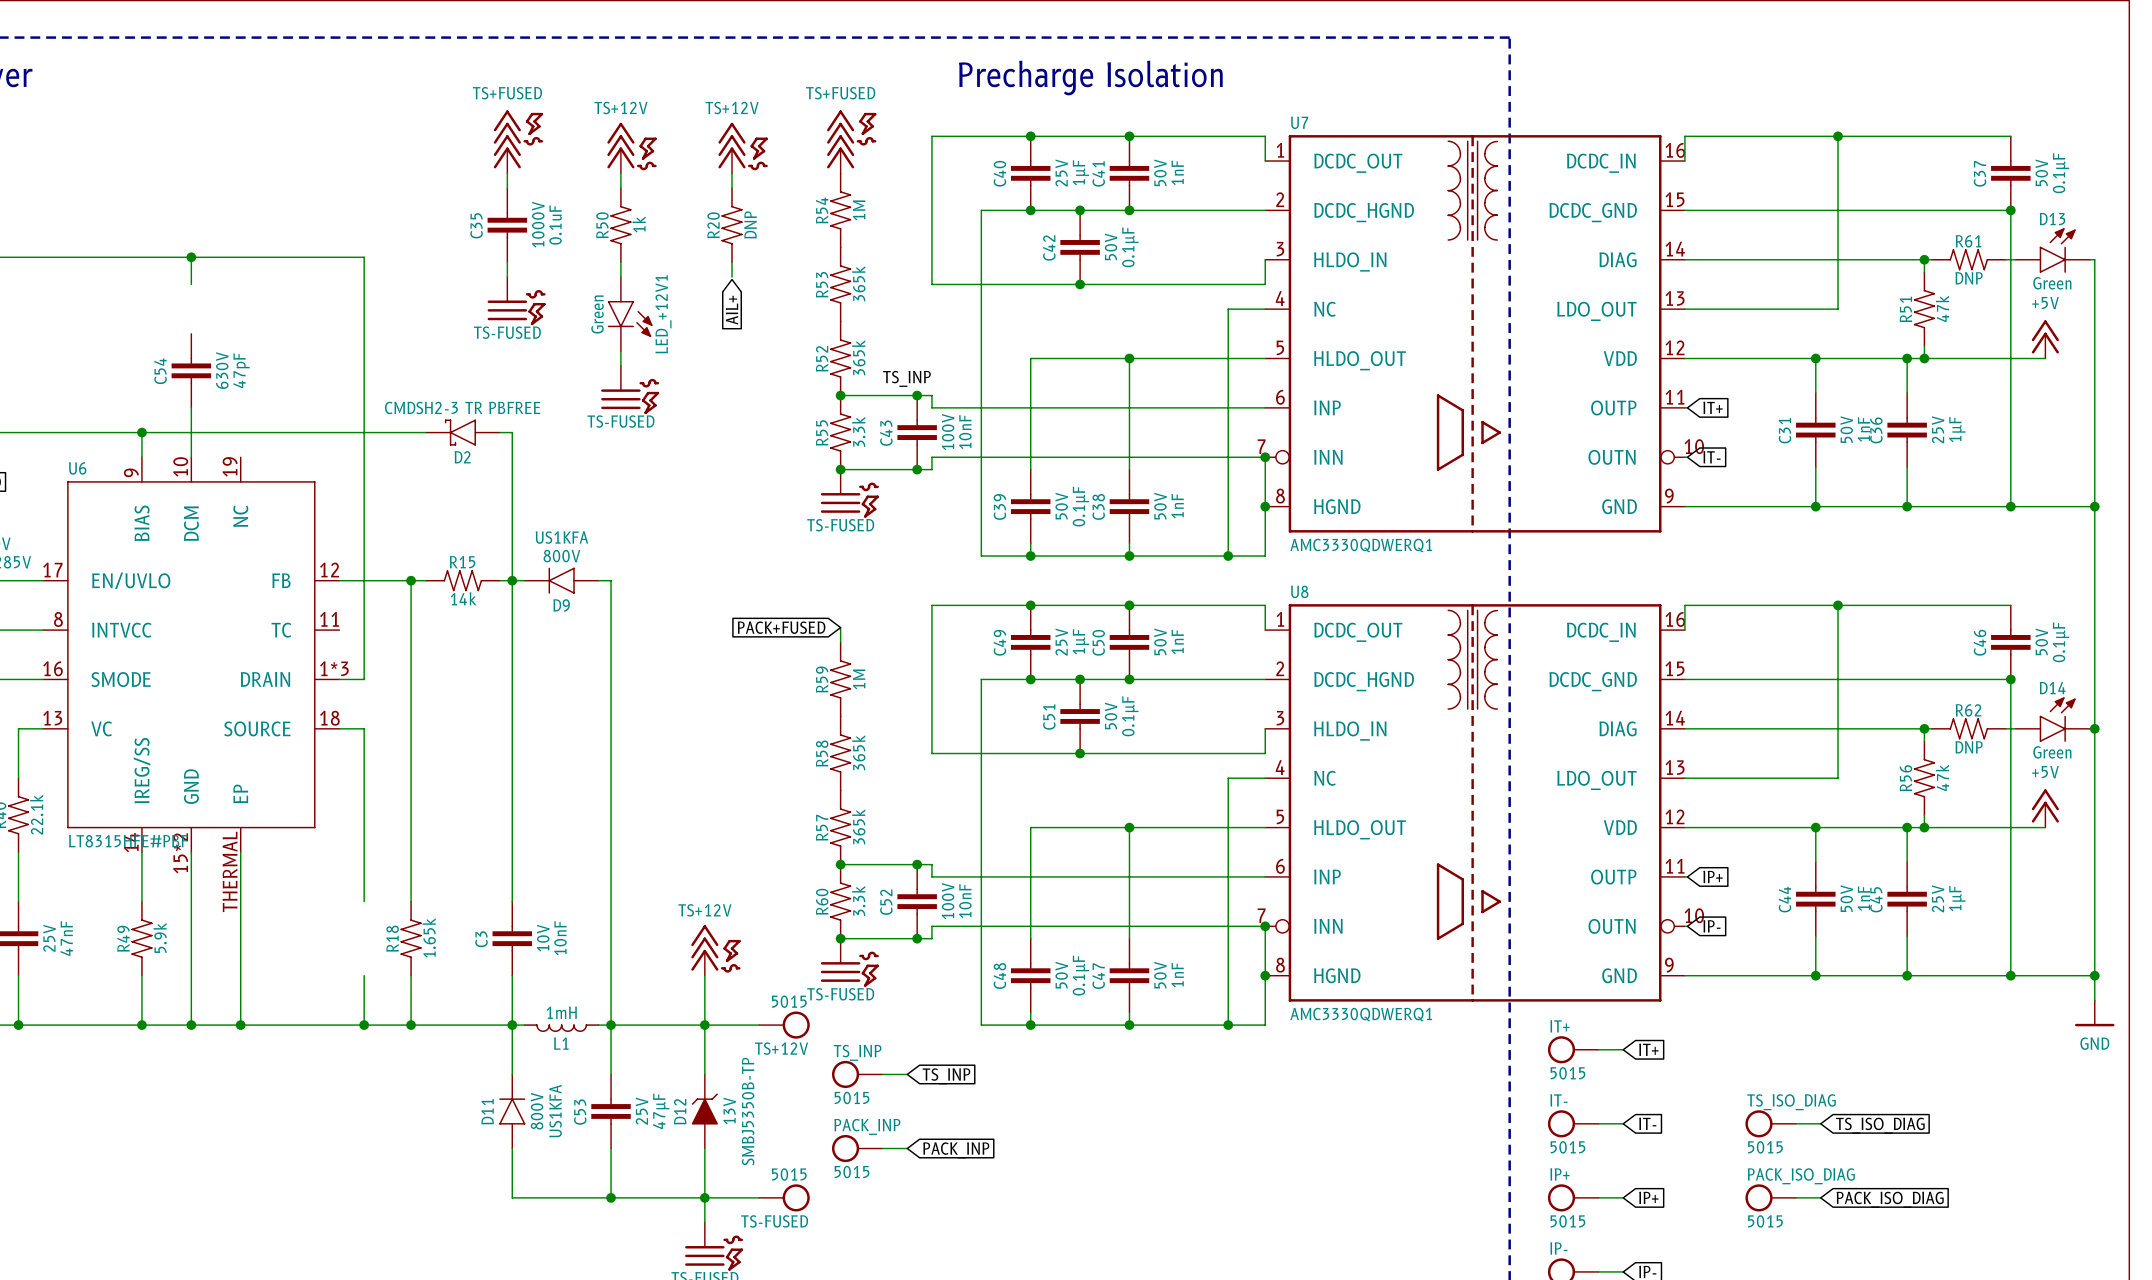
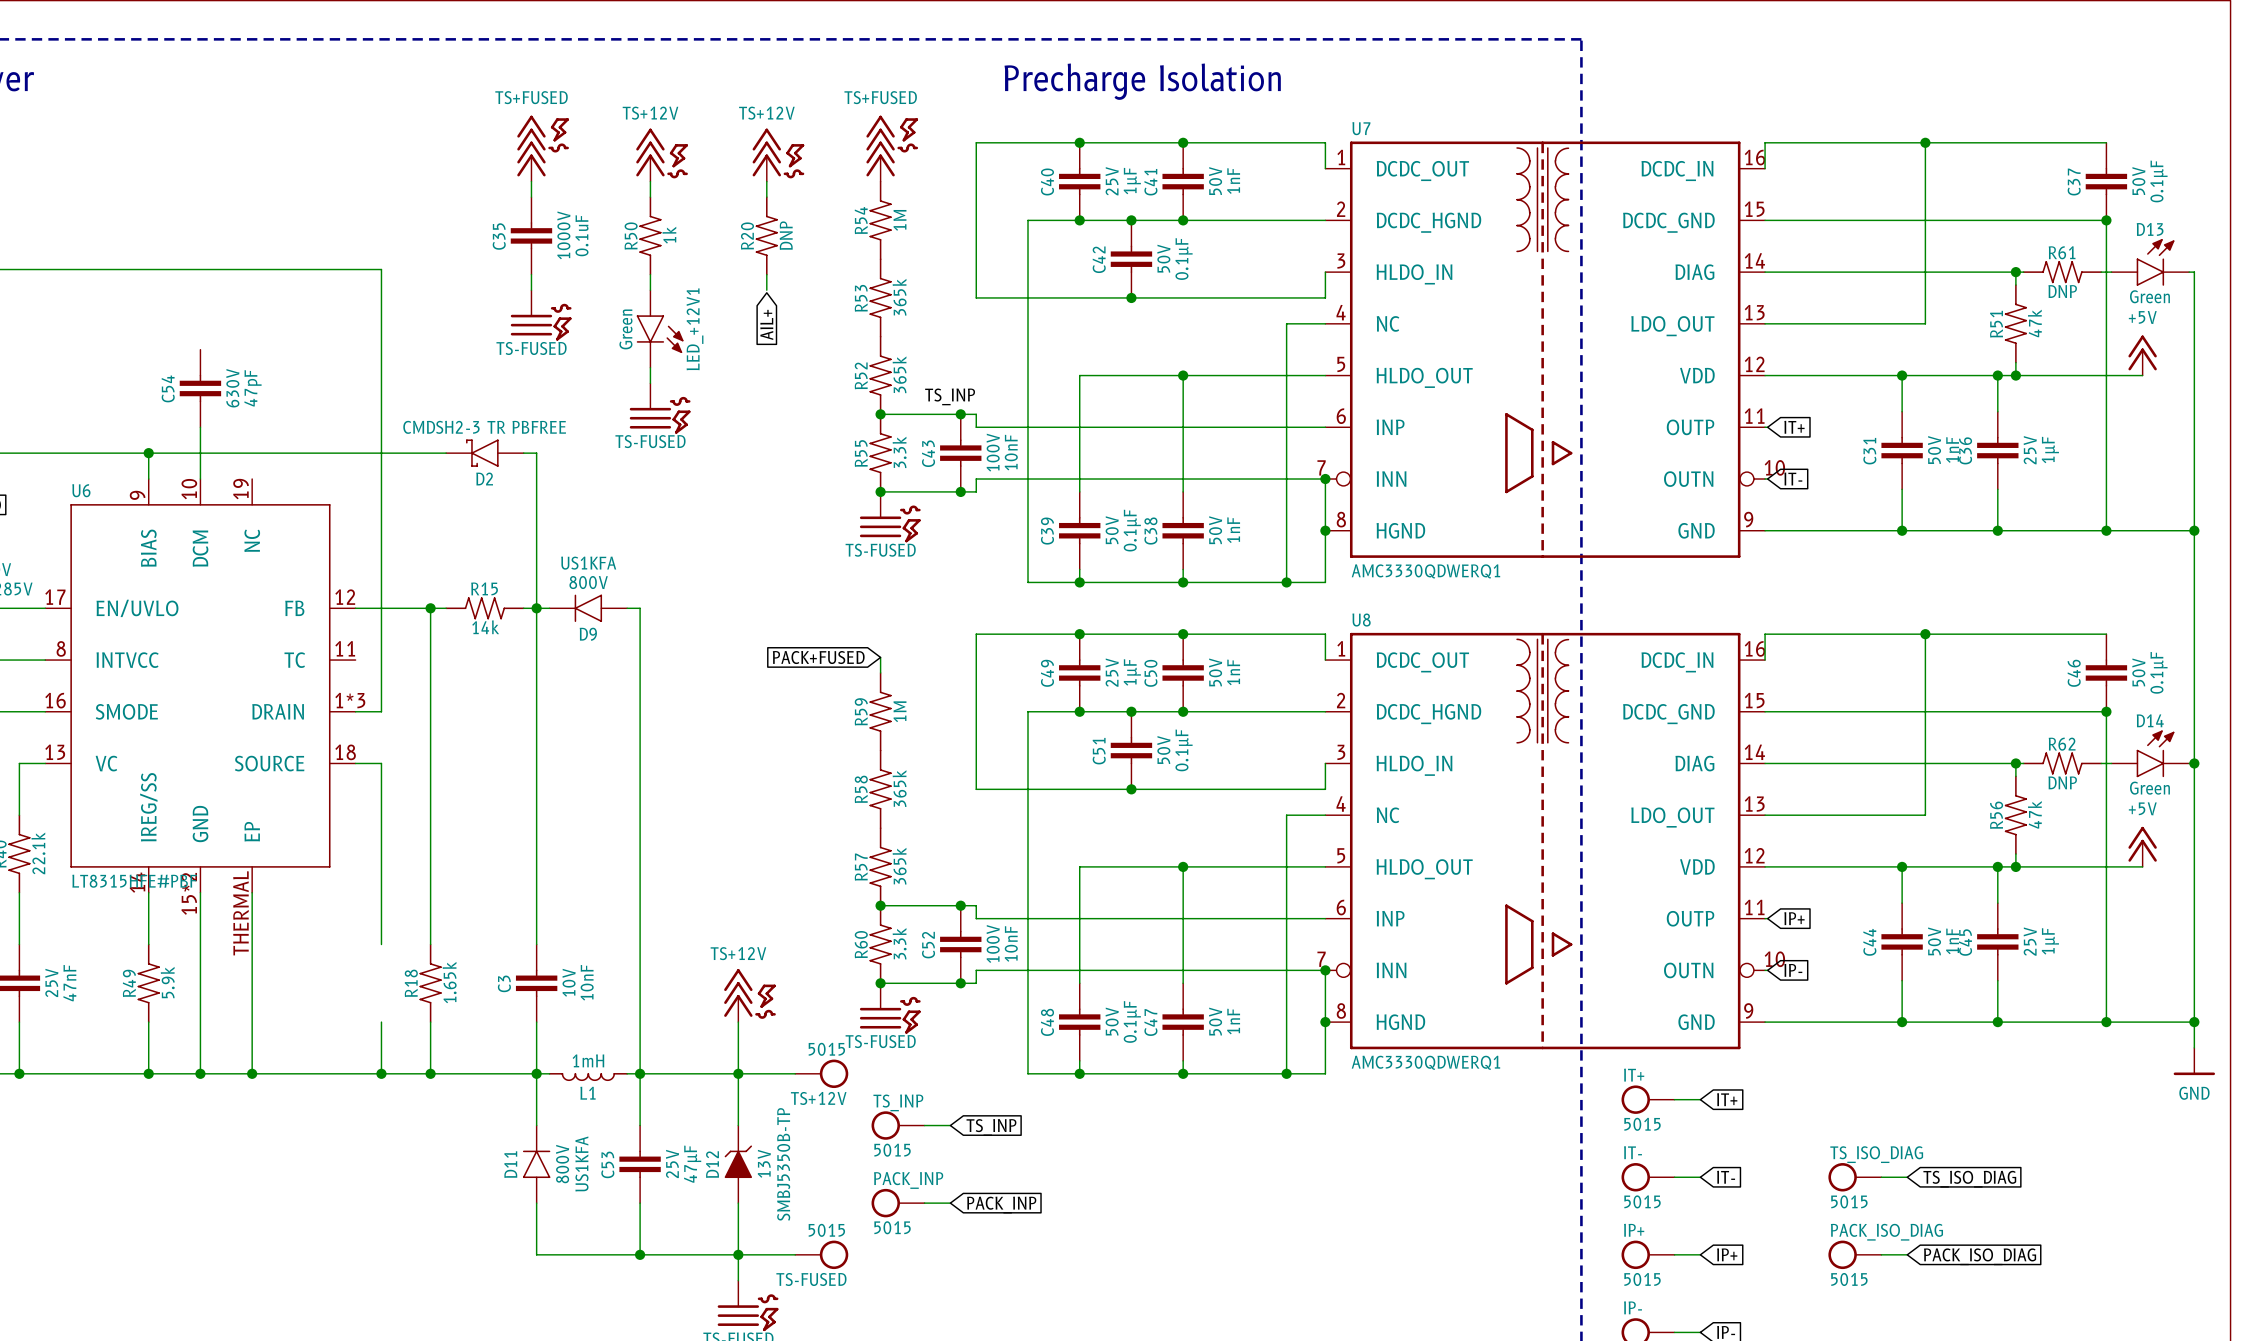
wire: (191, 257) (191, 284) -> none
junction: (191, 257) -> none

